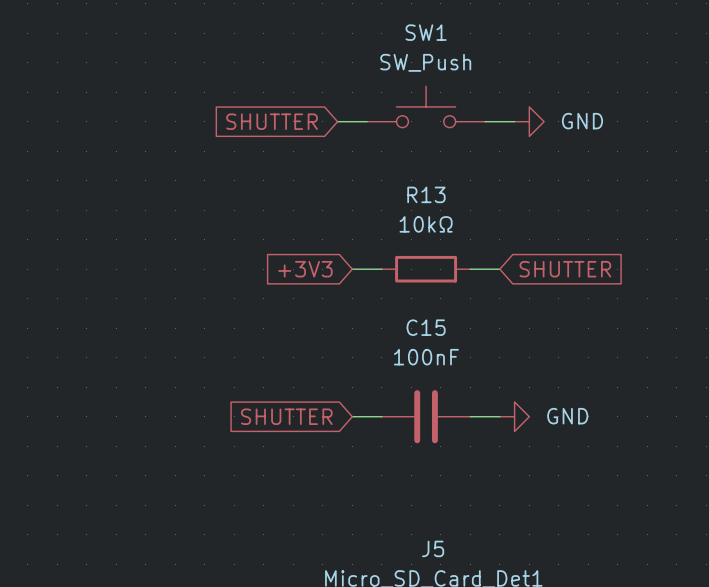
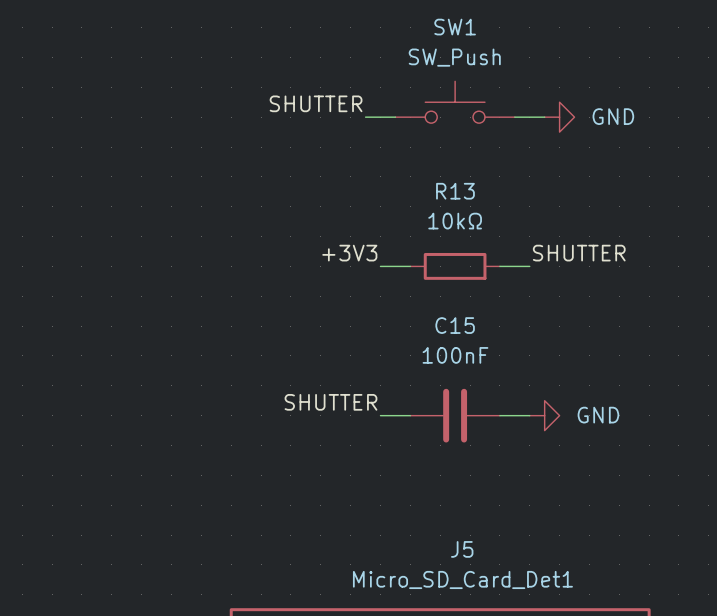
label: none -> SHUTTER (316, 103)
global label: SHUTTER (272, 121) -> none
label: none -> +3V3 (349, 253)
label: none -> SHUTTER (579, 253)
global label: +3V3 (305, 269) -> none
global label: SHUTTER (565, 269) -> none
label: none -> SHUTTER (330, 402)
global label: SHUTTER (286, 416) -> none

